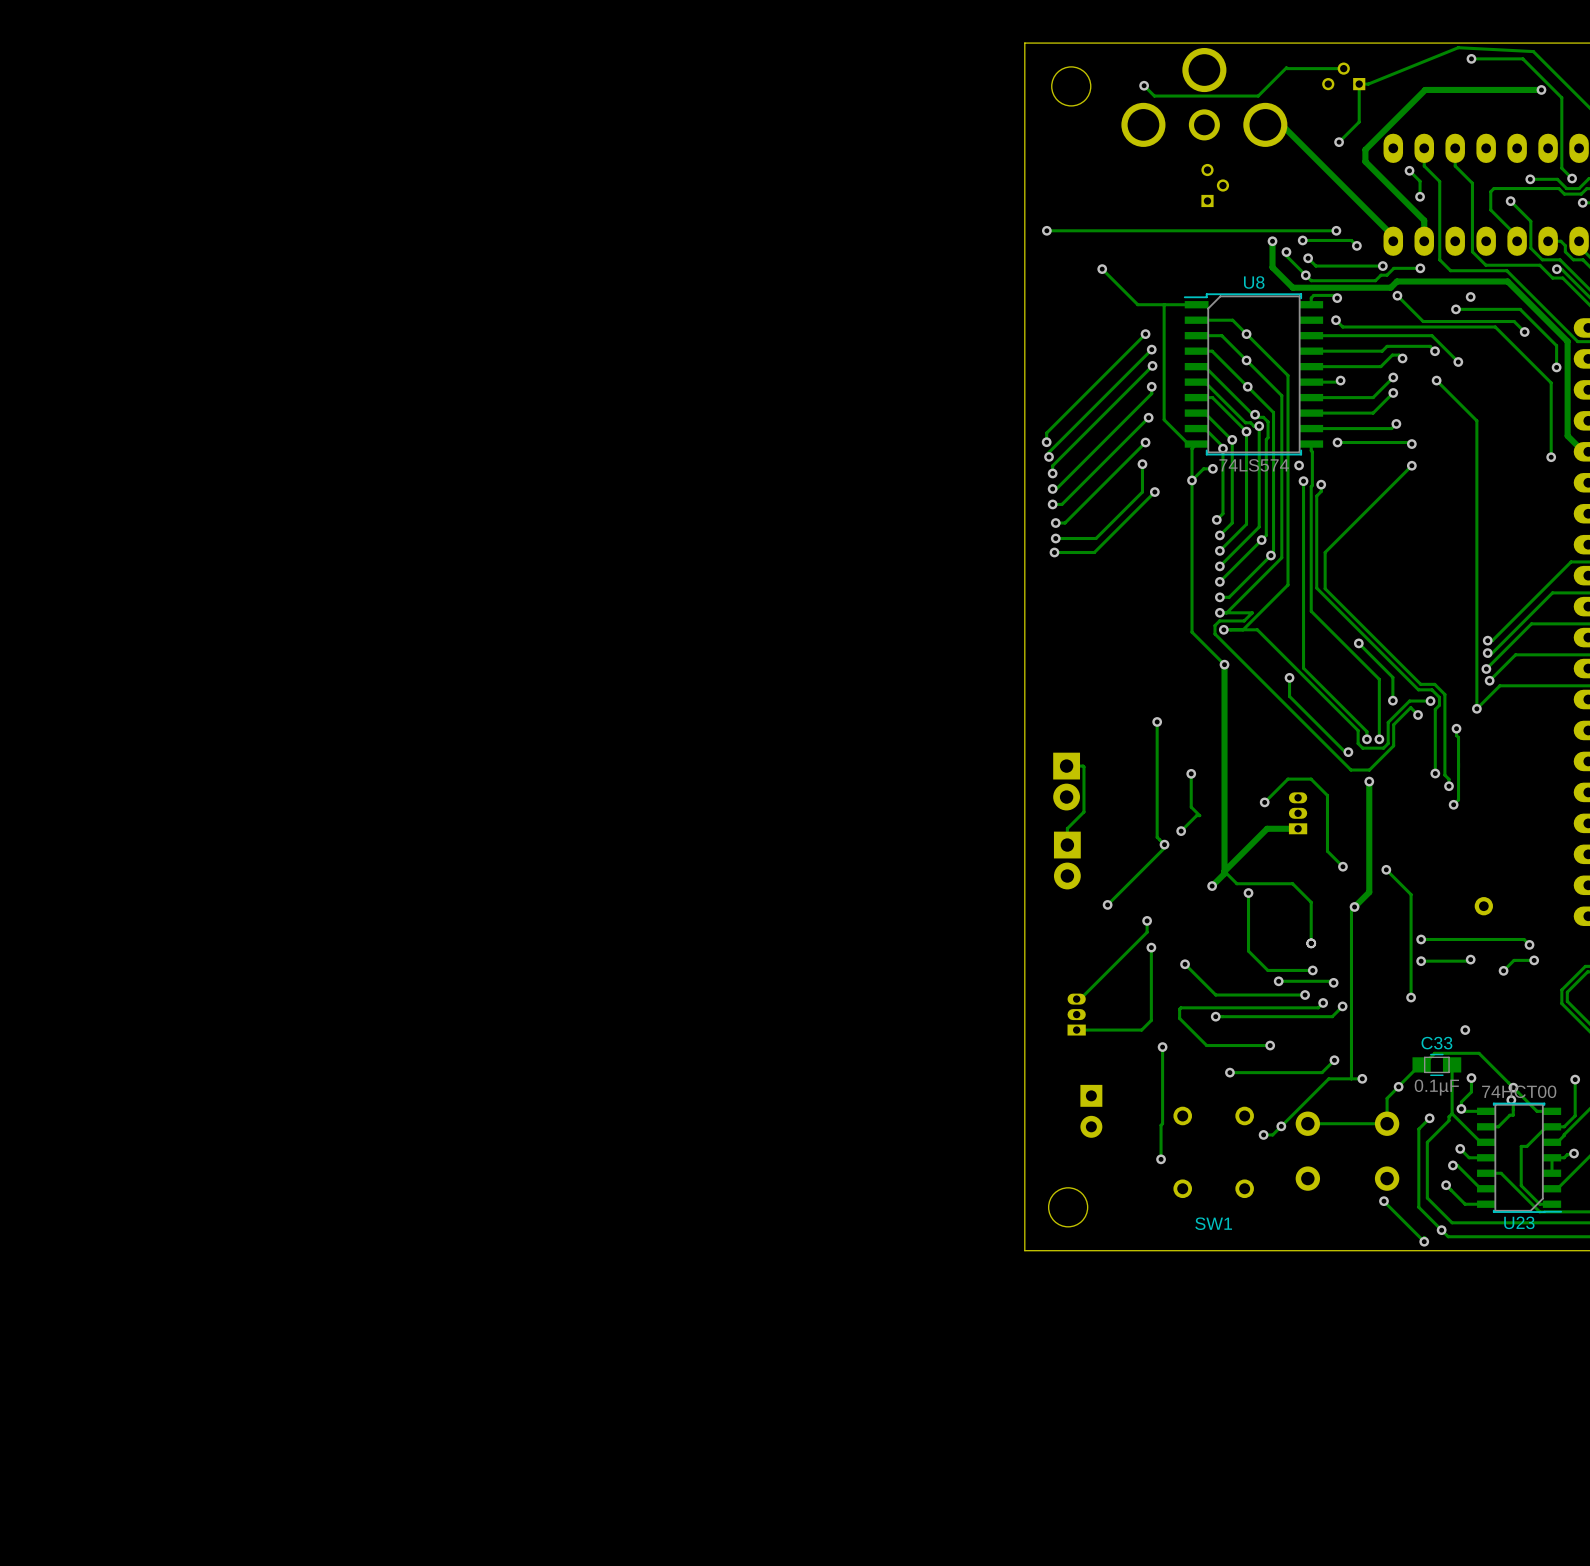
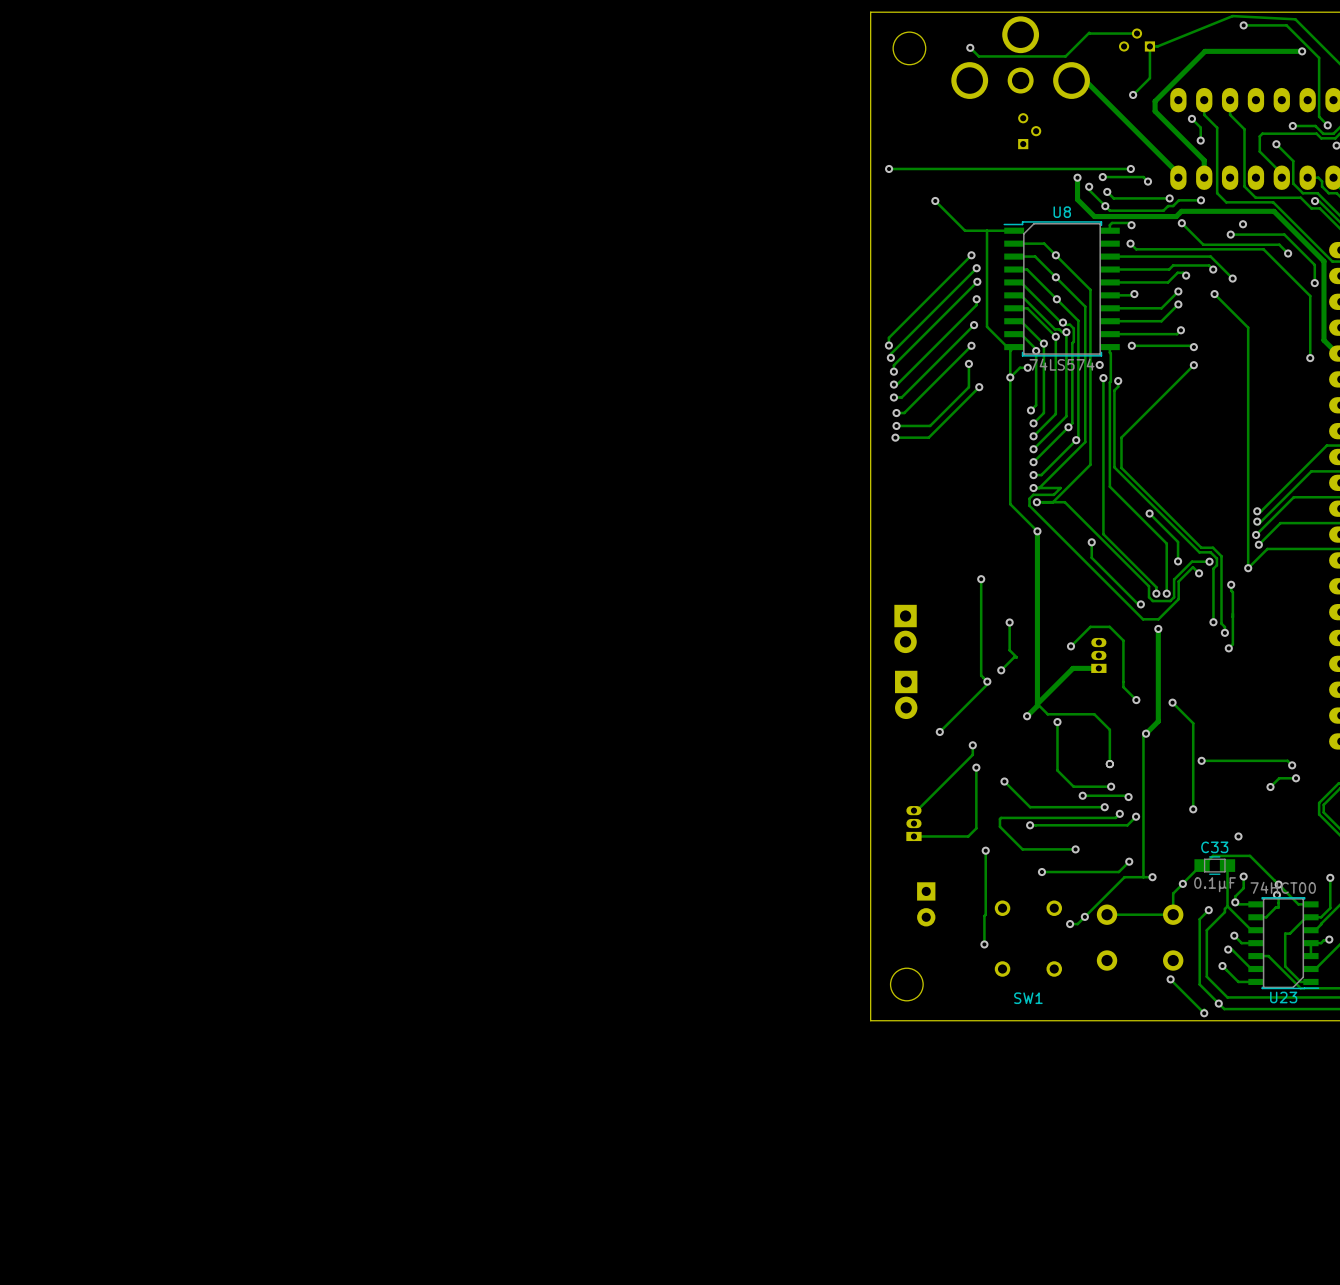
track: (1066, 766) (1083, 767) (1083, 811) (1067, 828) (1067, 845) -> none
part: (1483, 906) -> none
track: (1470, 959) (1421, 961) -> none
via: (1470, 959) -> none
via: (1421, 961) -> none

